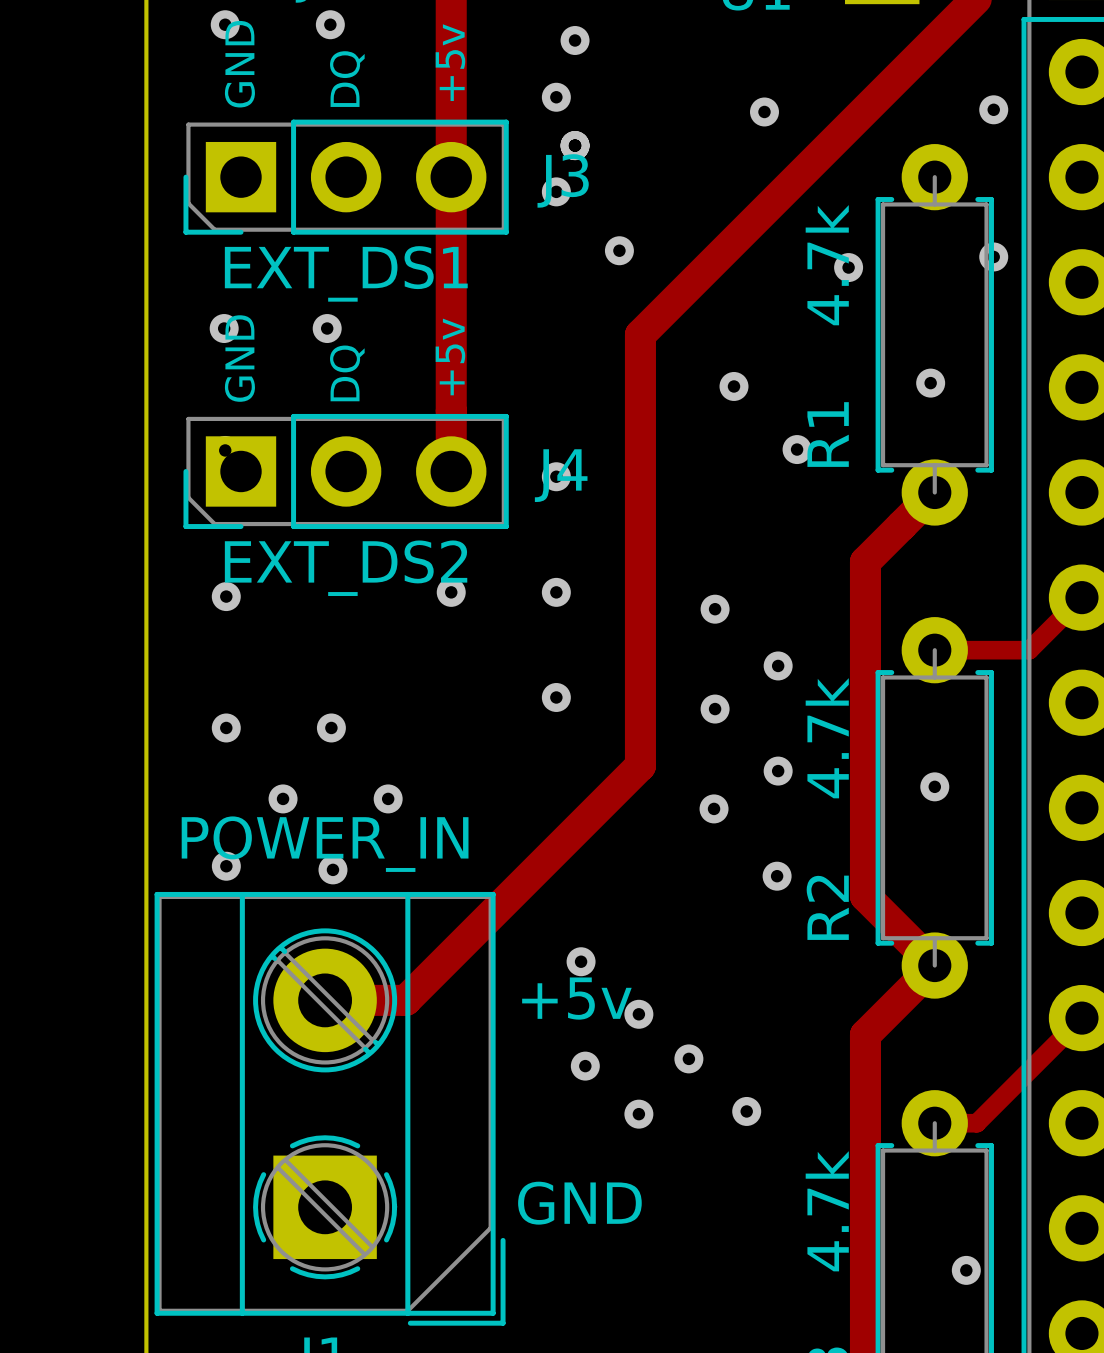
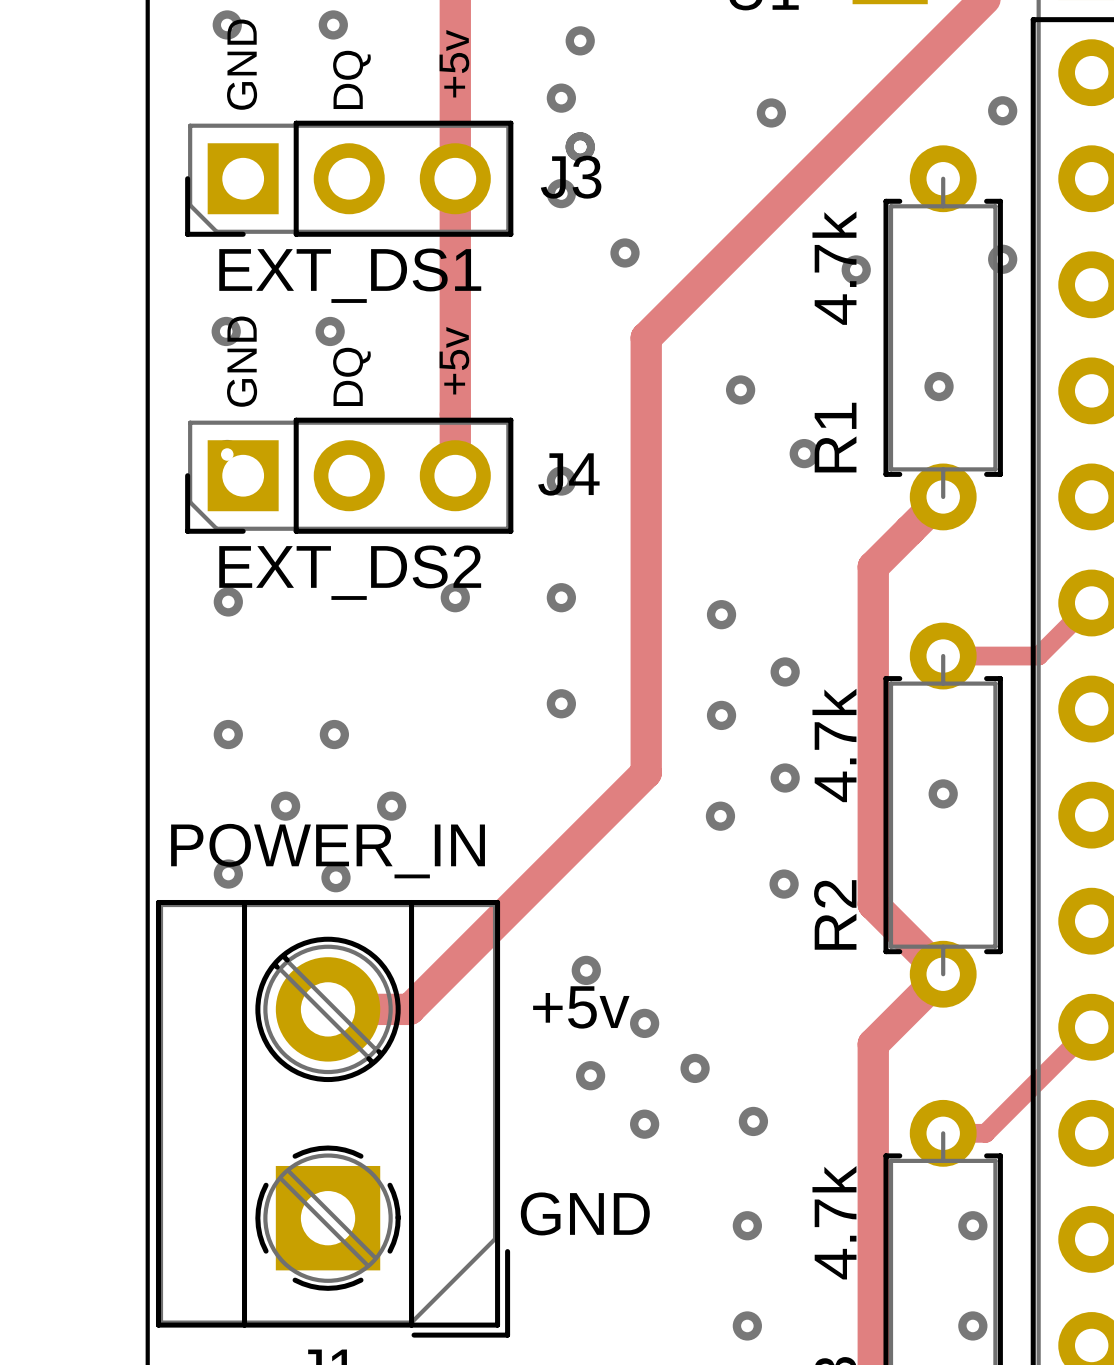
via: none -> (747, 1225)
via: none -> (972, 1225)
via: (966, 1270) -> none
via: none -> (747, 1325)
via: none -> (972, 1325)

